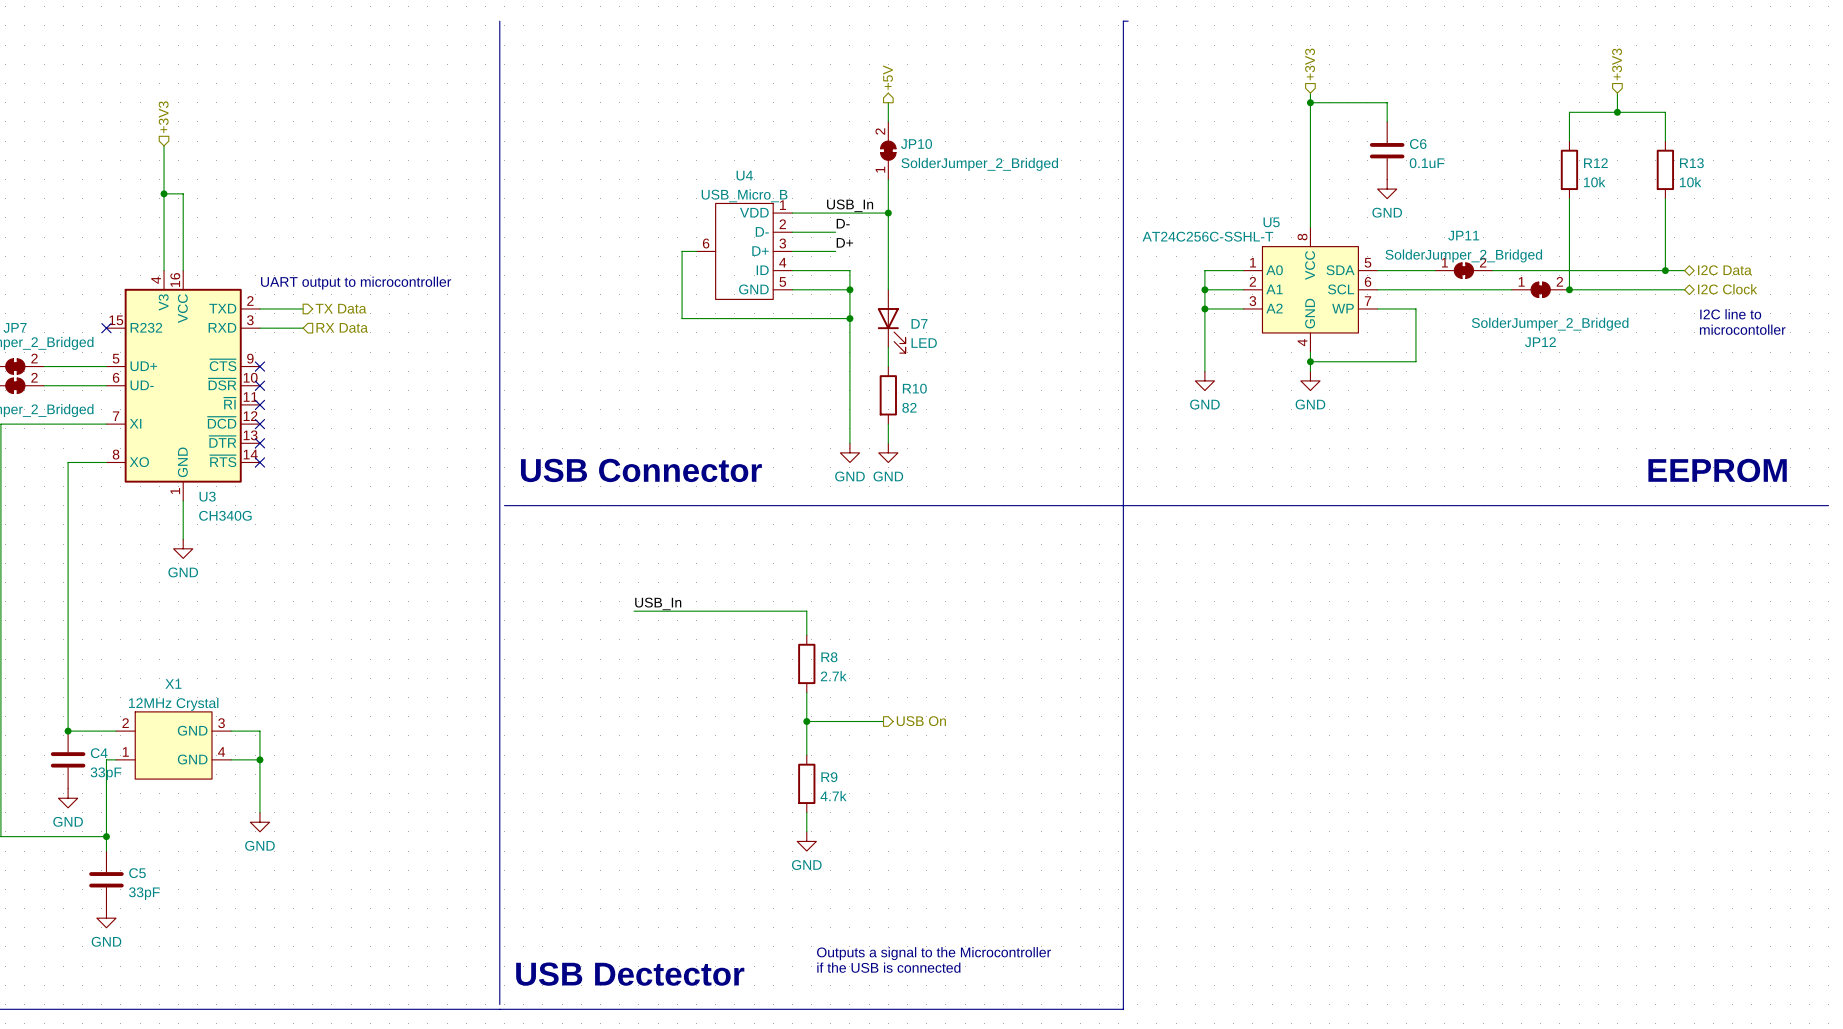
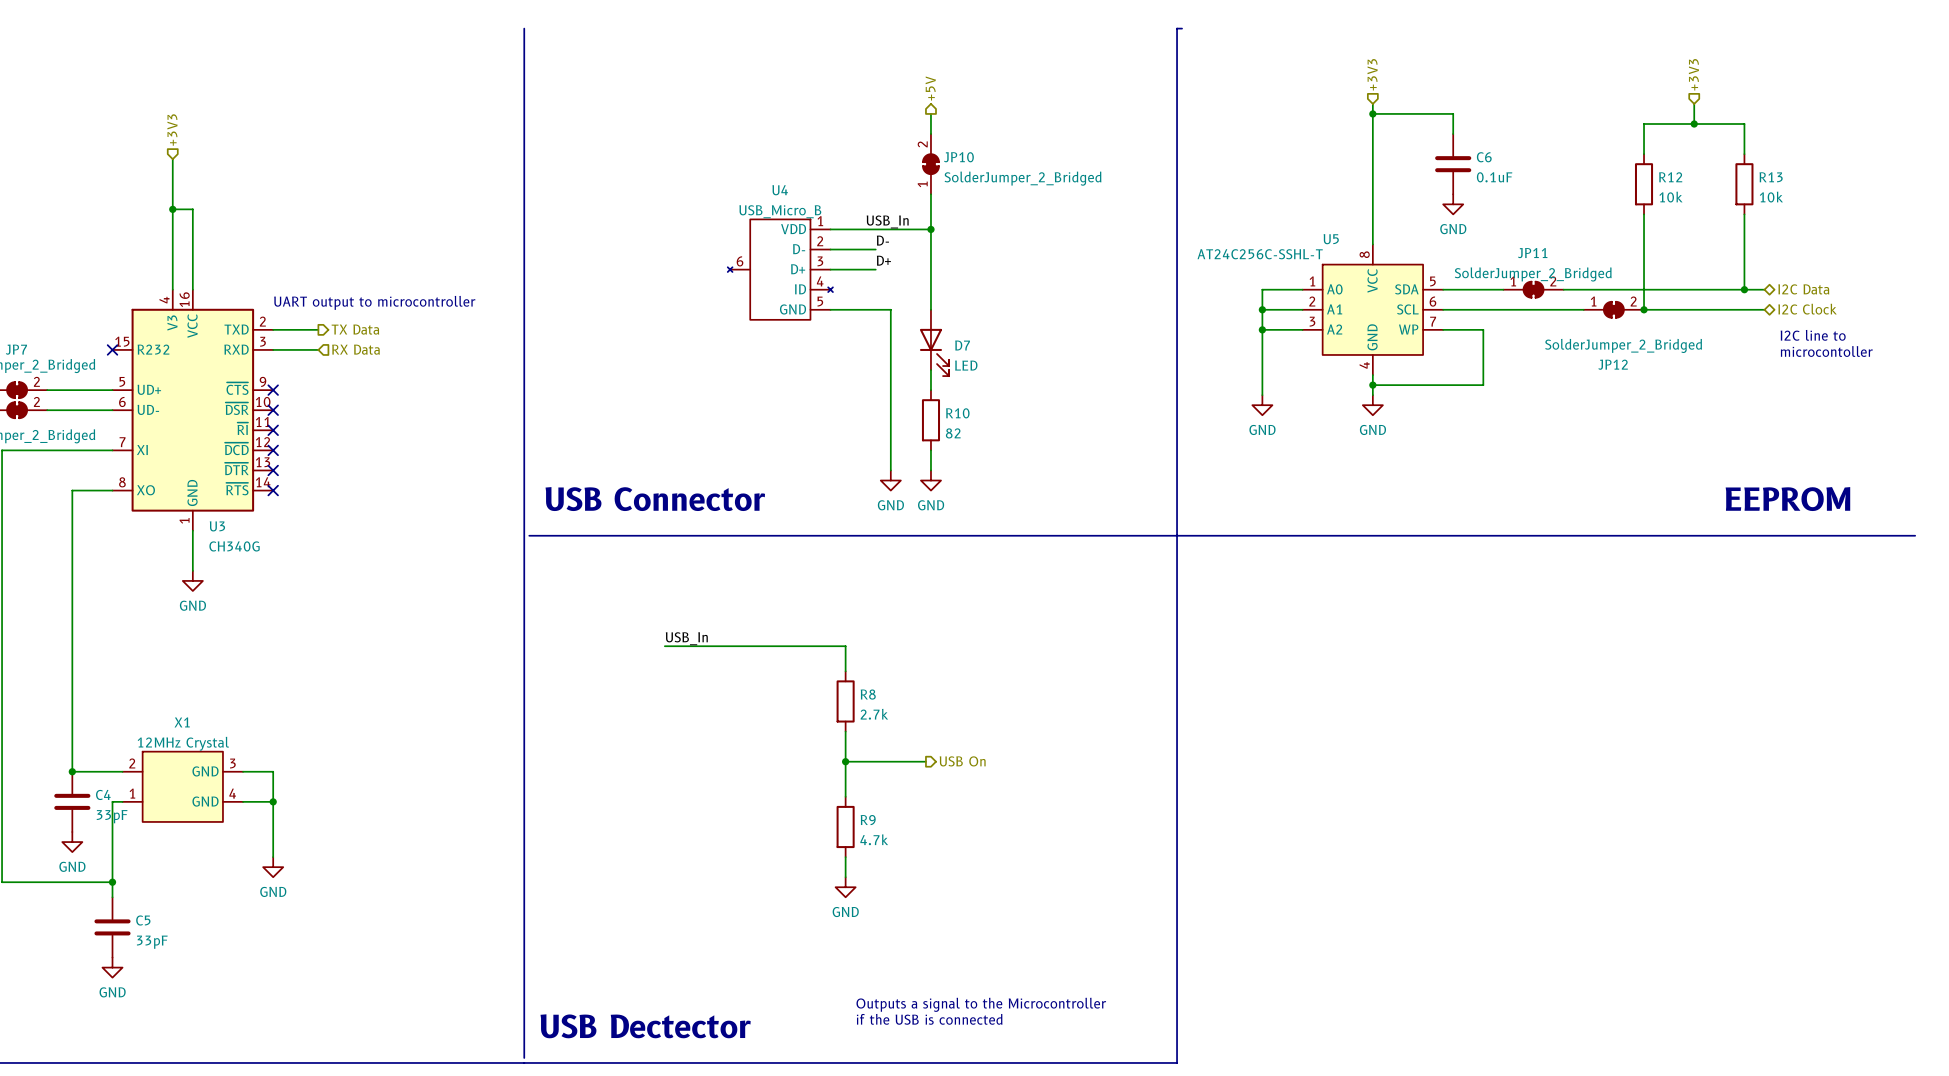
U4 symbol: [696, 202, 793, 300] -> [727, 218, 833, 321]
wire: (696, 251) (682, 251) (682, 318) (849, 318) -> none
wire: (792, 270) (849, 270) (849, 289) -> none
junction: (849, 289) -> none
junction: (849, 318) -> none

